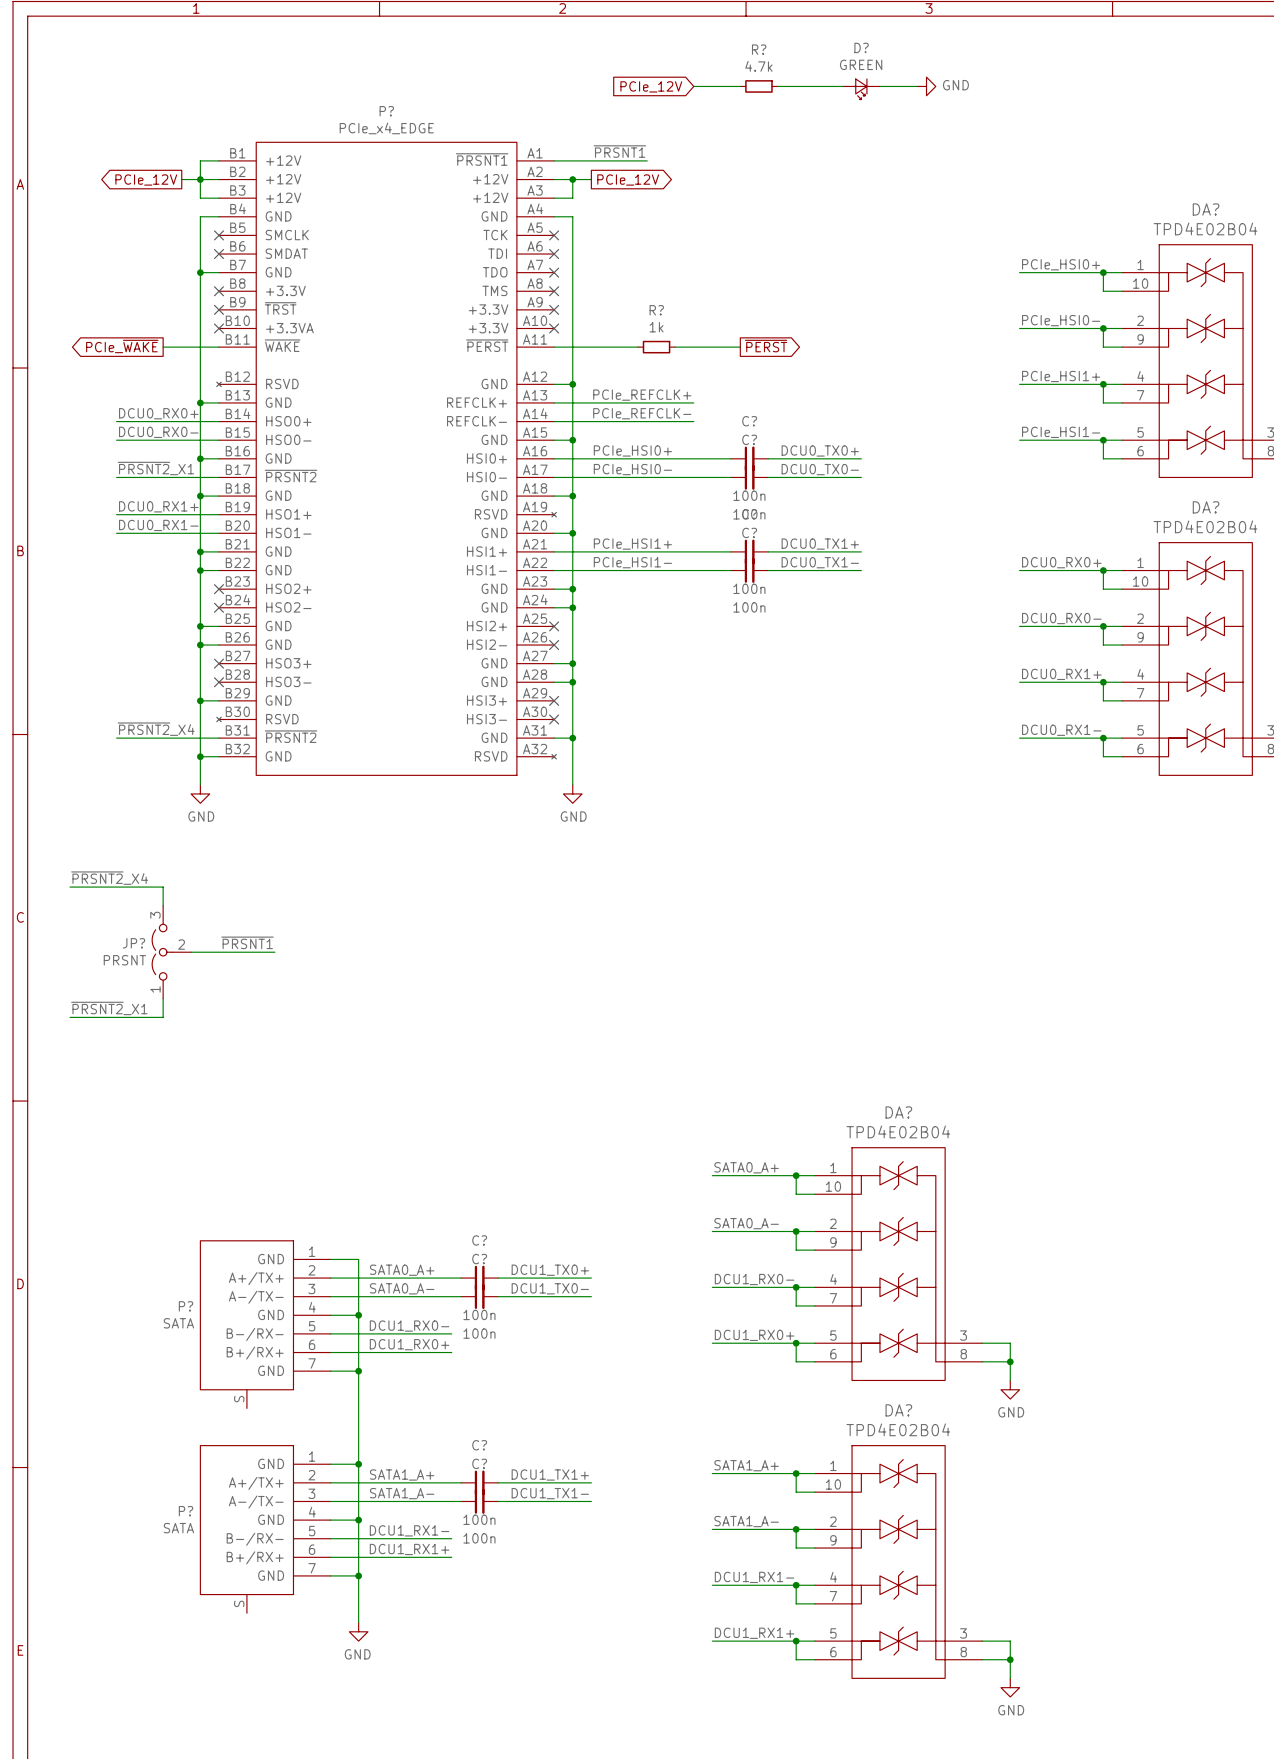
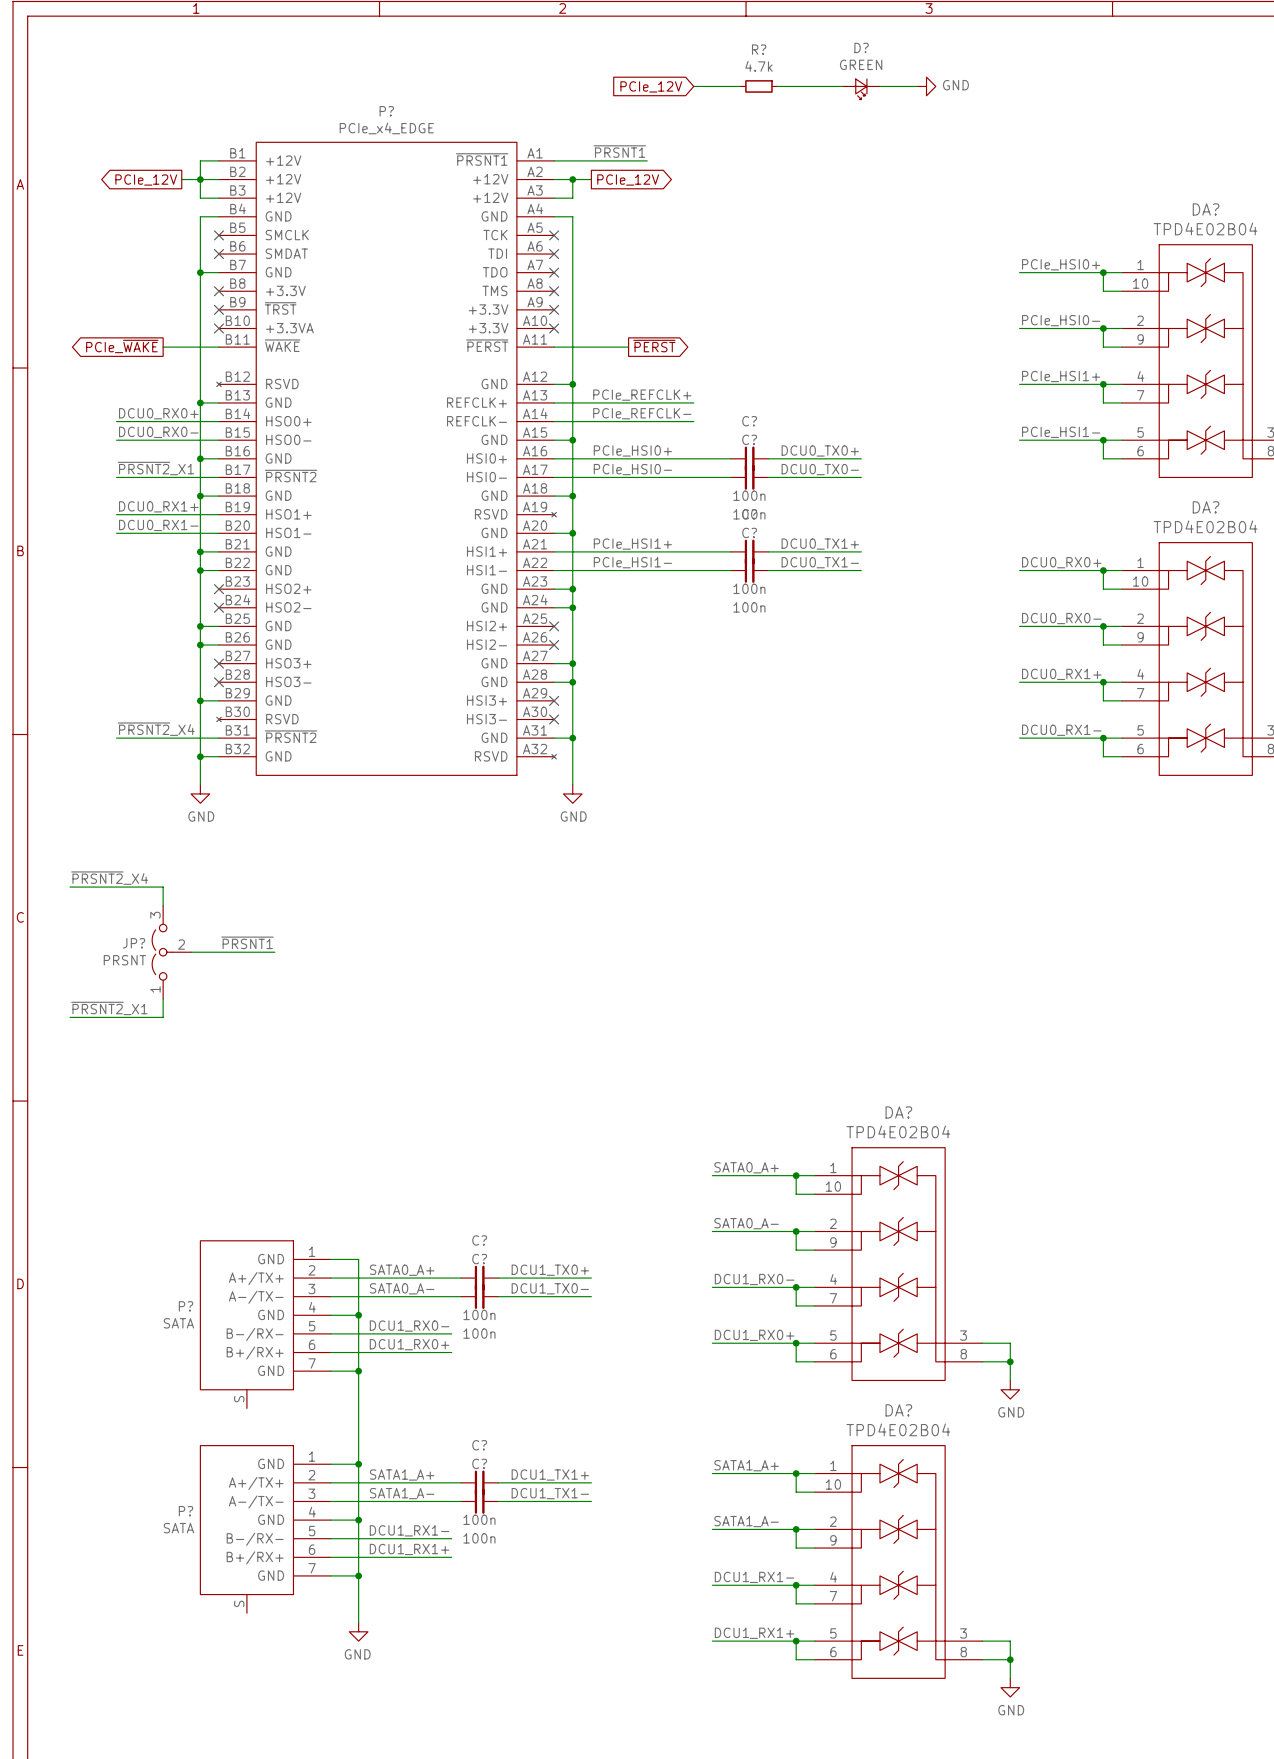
global label position: ~{PERST} (766, 346) -> ~{PERST} (654, 346)
wire: (628, 347) (637, 347) -> none
R?: 1k (656, 347) -> none
wire: (675, 347) (740, 347) -> none

